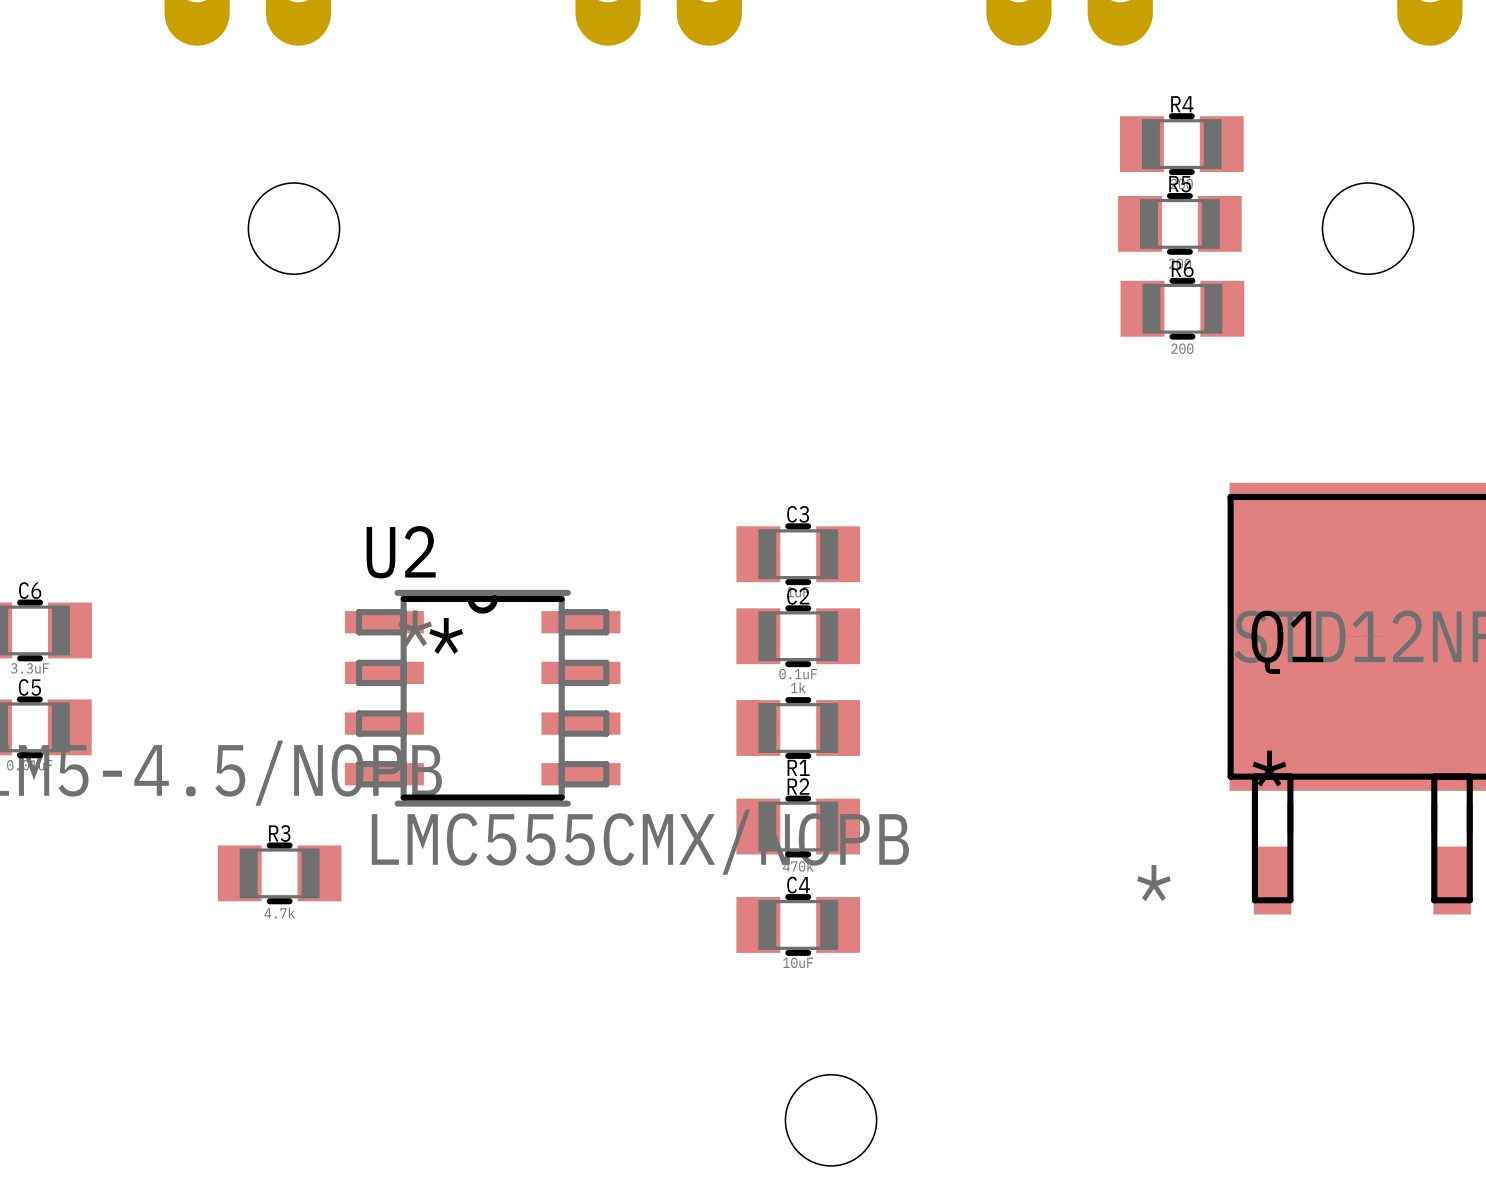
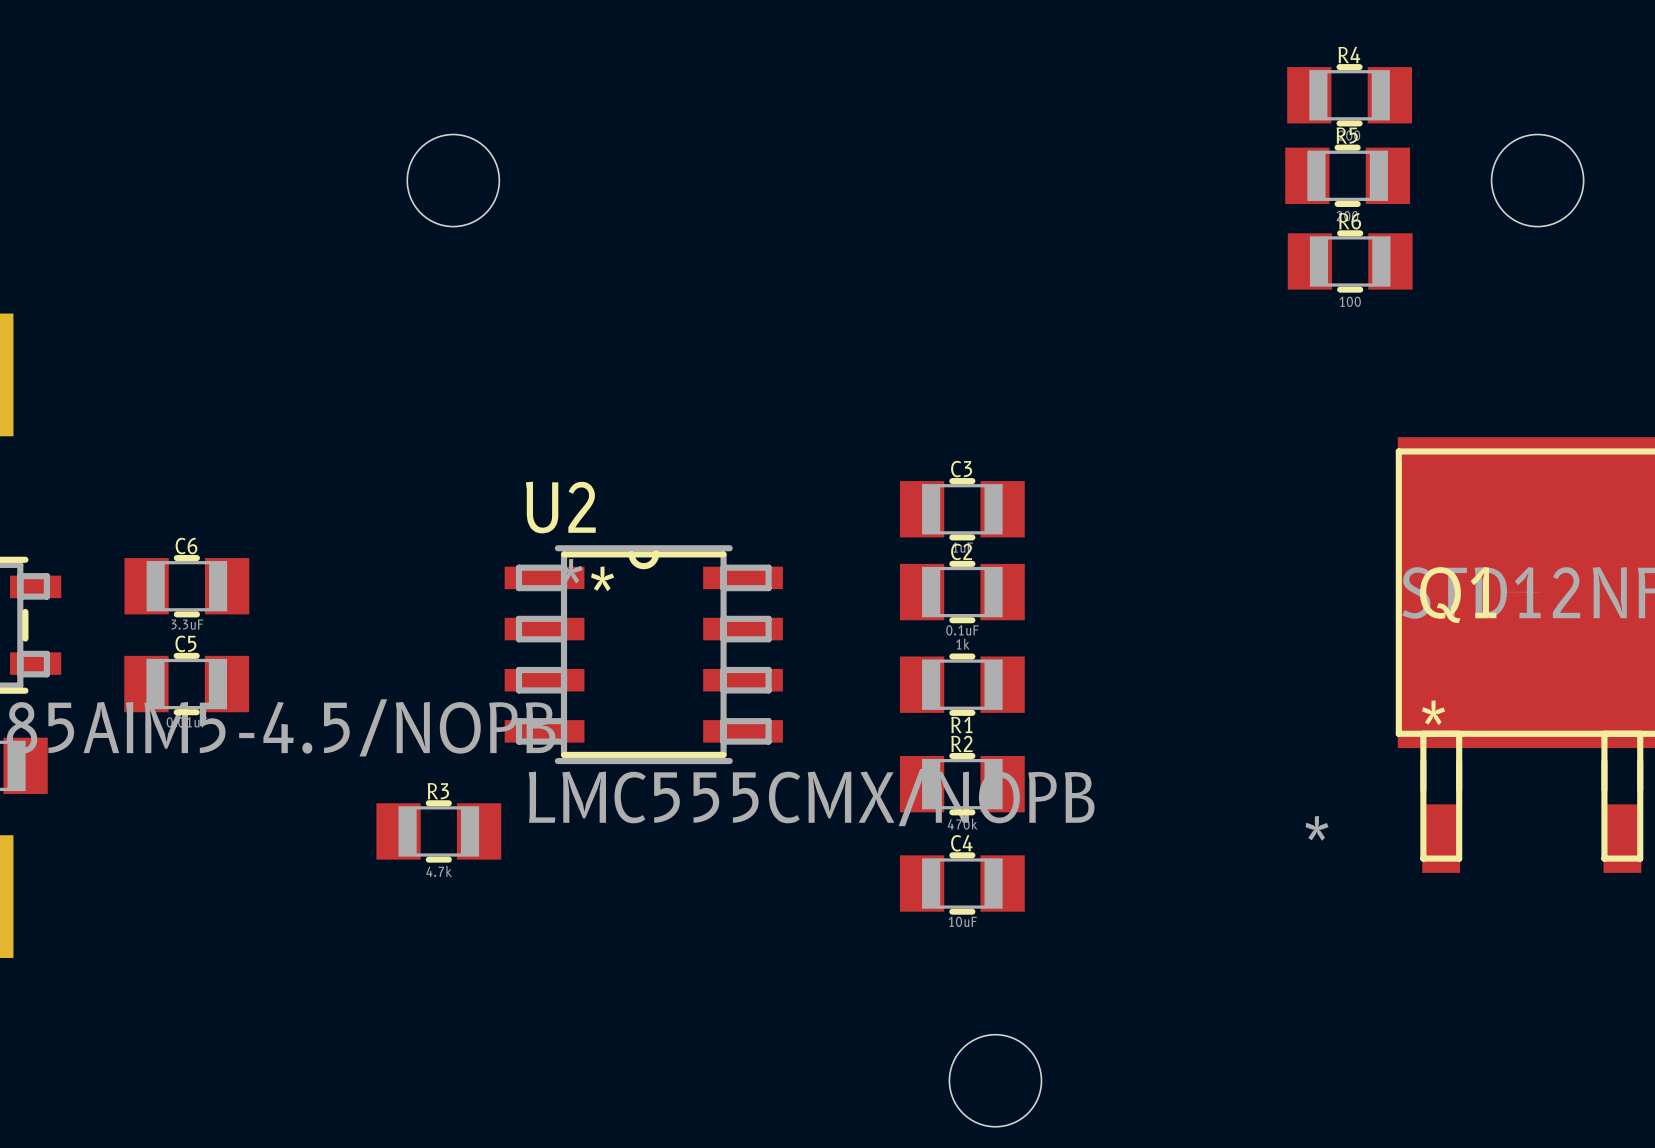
R6 value: 200 (1182, 348) -> 100 (1350, 301)

